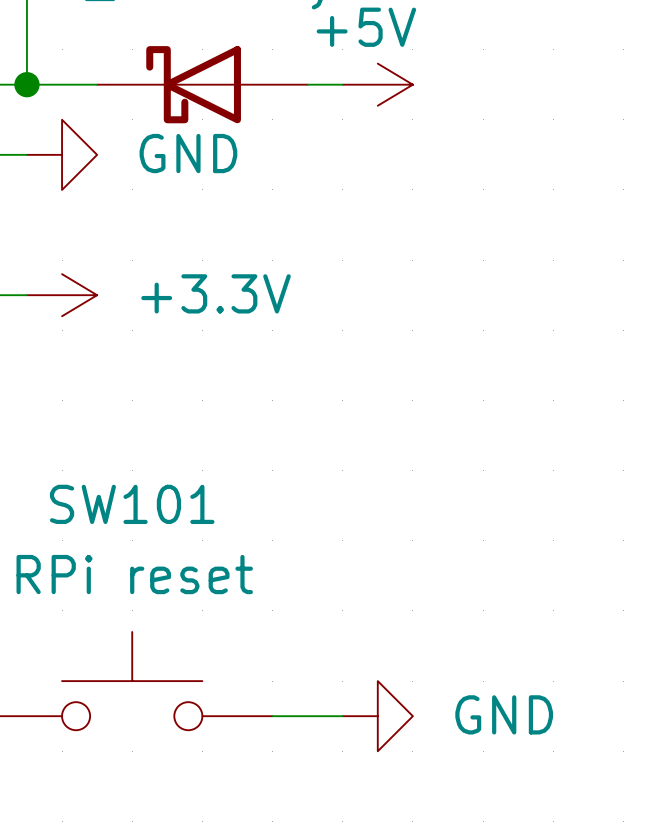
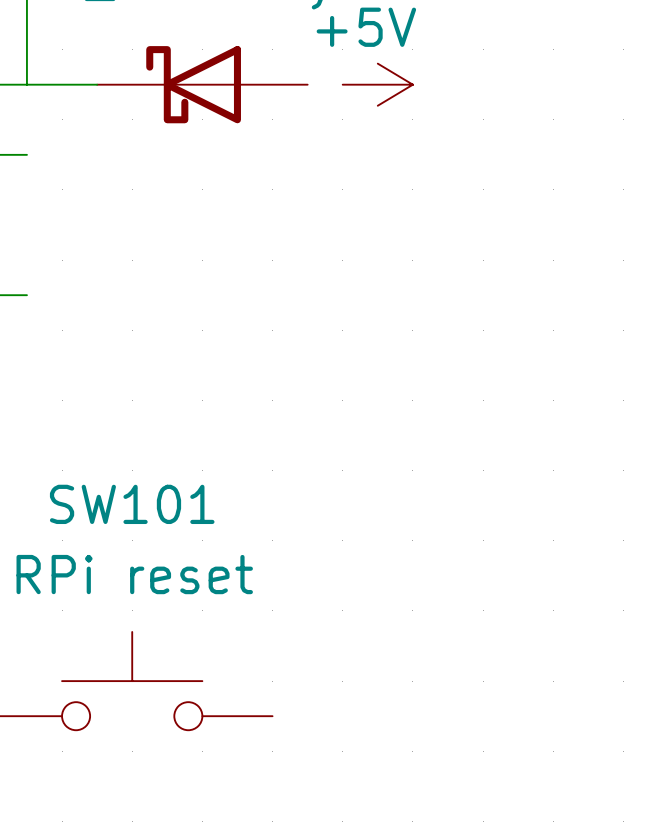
junction: (26, 84) -> none
wire: (307, 84) (342, 84) -> none
power symbol: GND (62, 154) -> none
power symbol: +3.3V (62, 295) -> none
wire: (272, 716) (342, 716) -> none
power symbol: GND (377, 716) -> none

